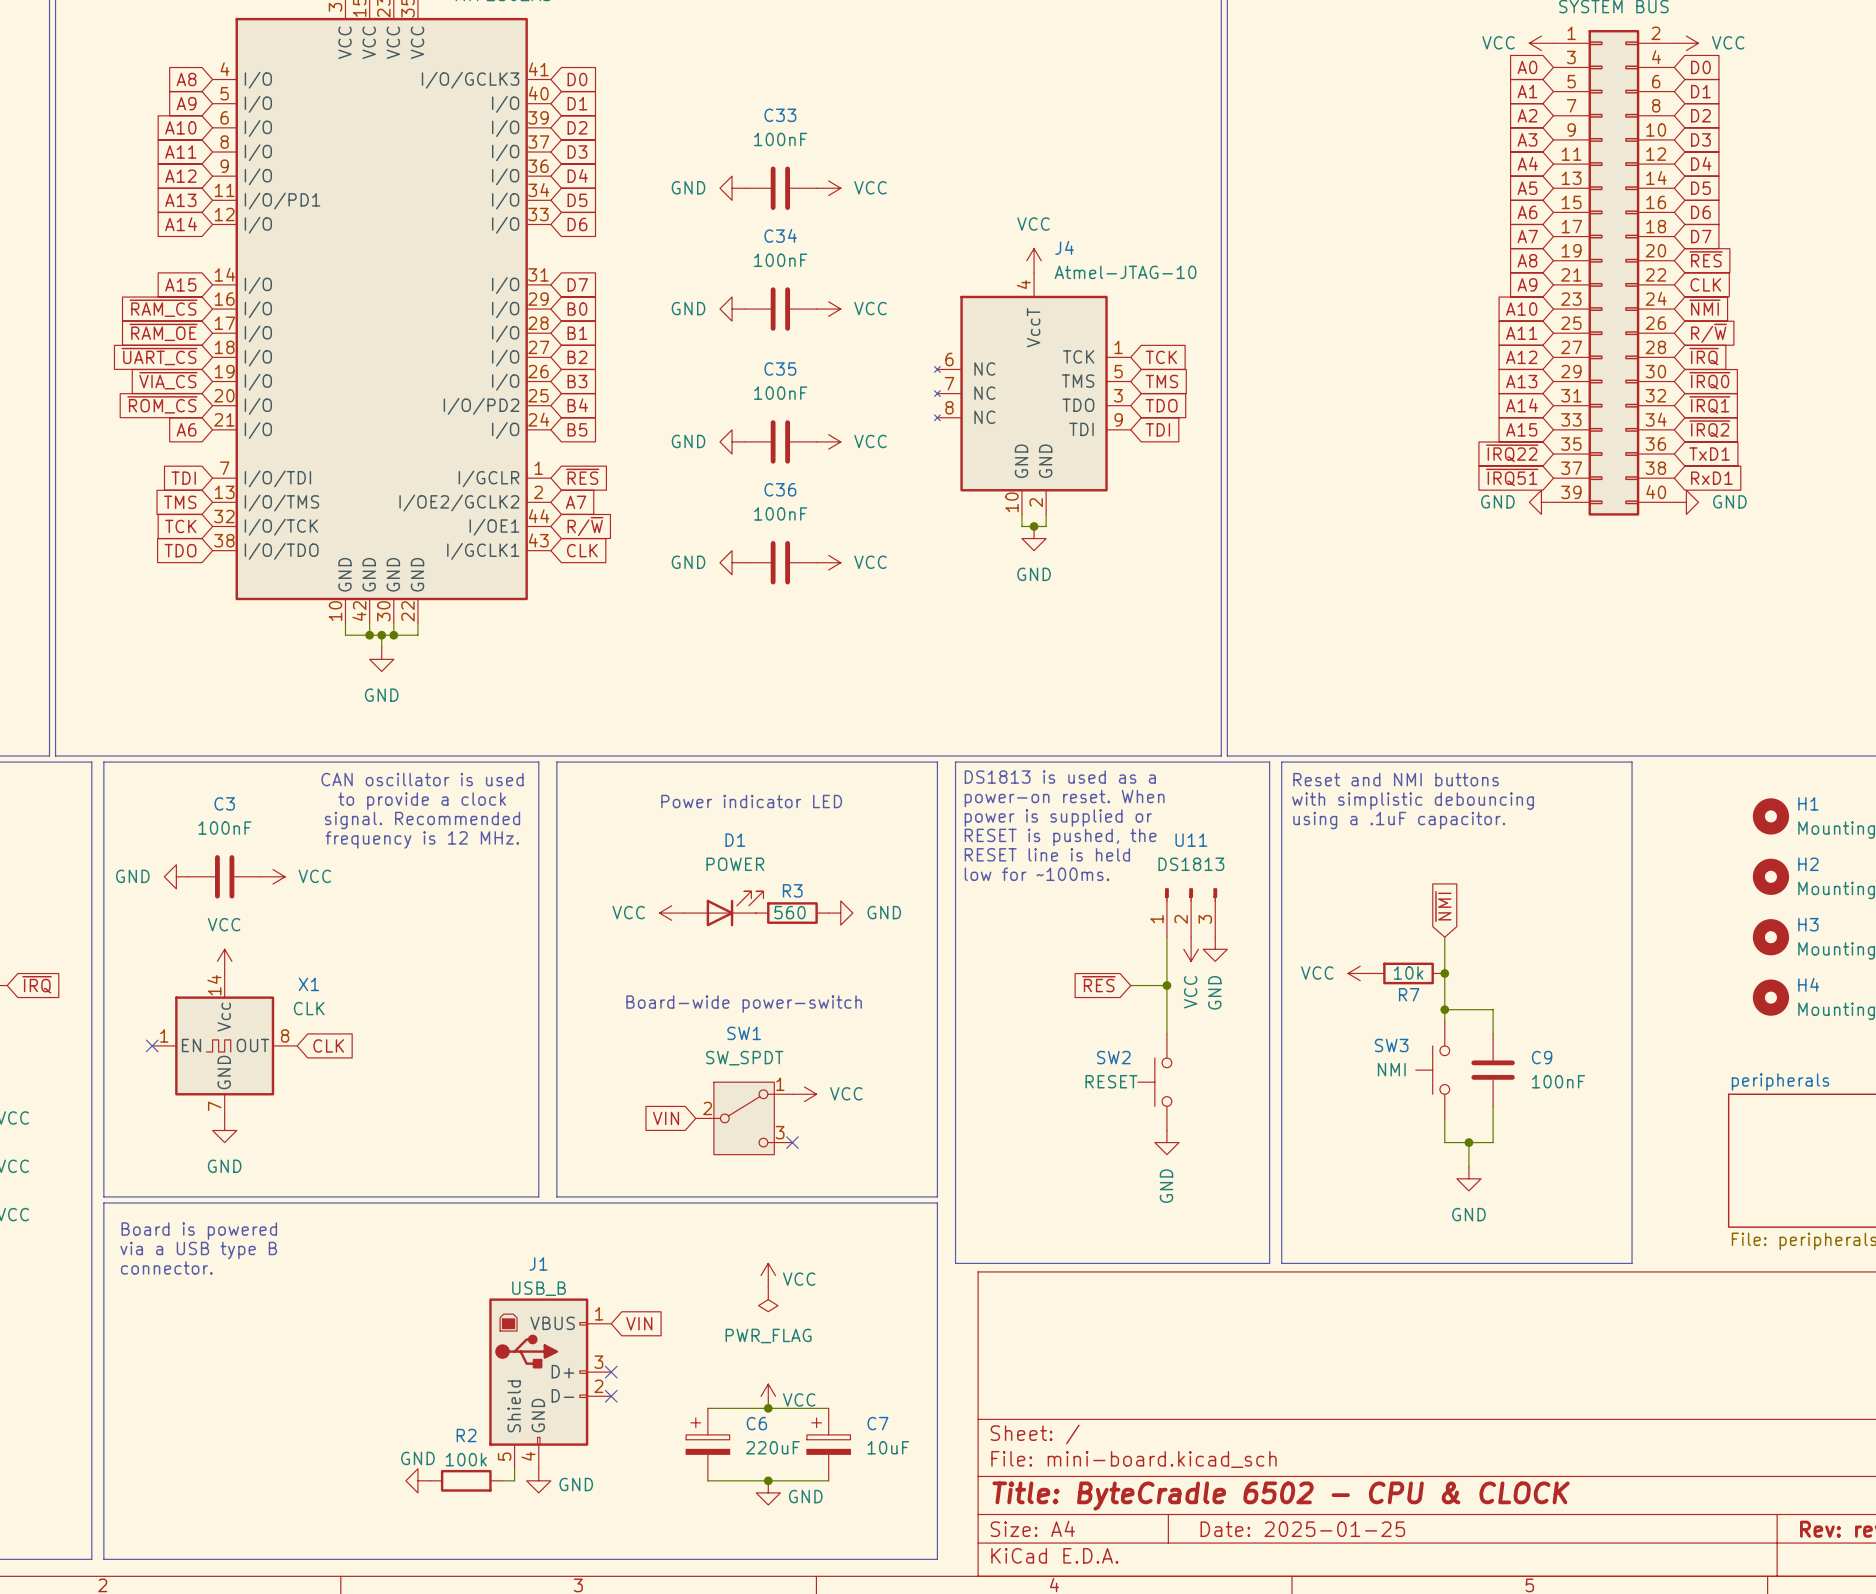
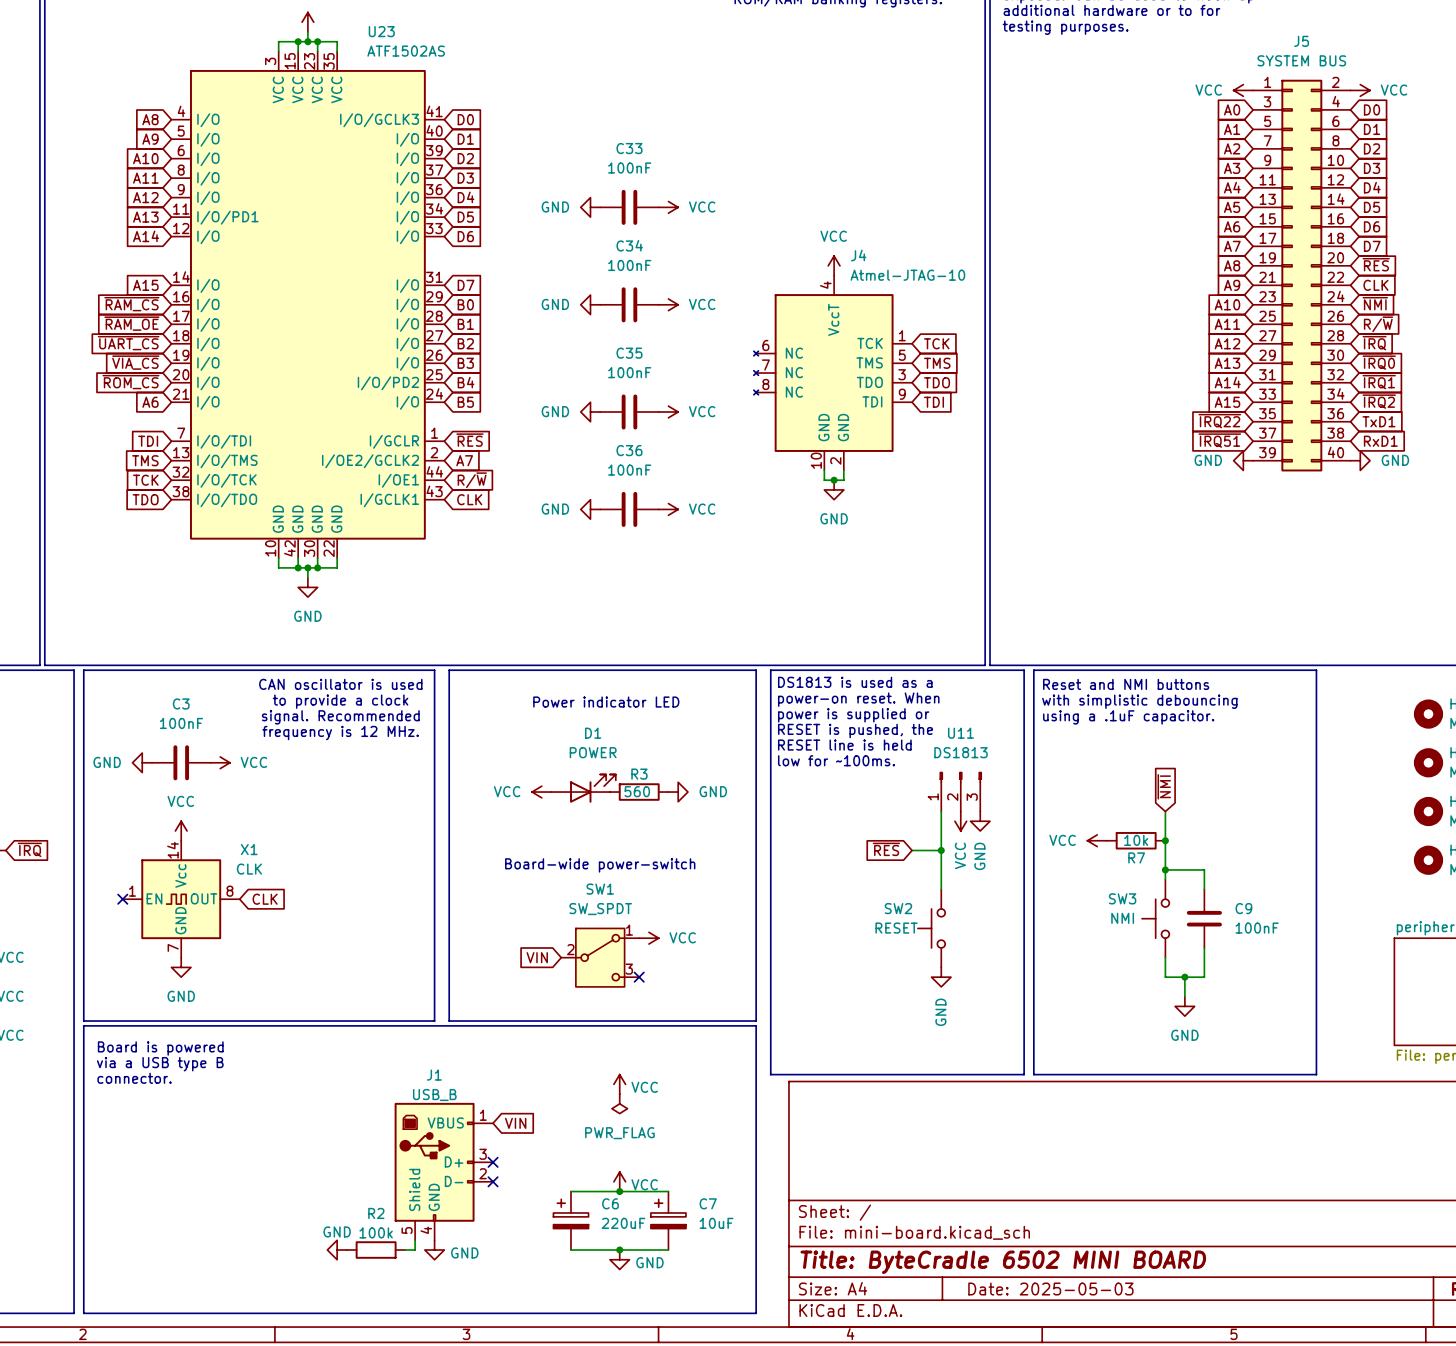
title block: Title: ByteCradle 6502 - CPU & CLOCK (1281, 1496) -> Title: ByteCradle 6502 MINI BOARD (1003, 1262)
title block: Date: 2025-01-25 (1302, 1529) -> Date: 2025-05-03 (1050, 1289)

